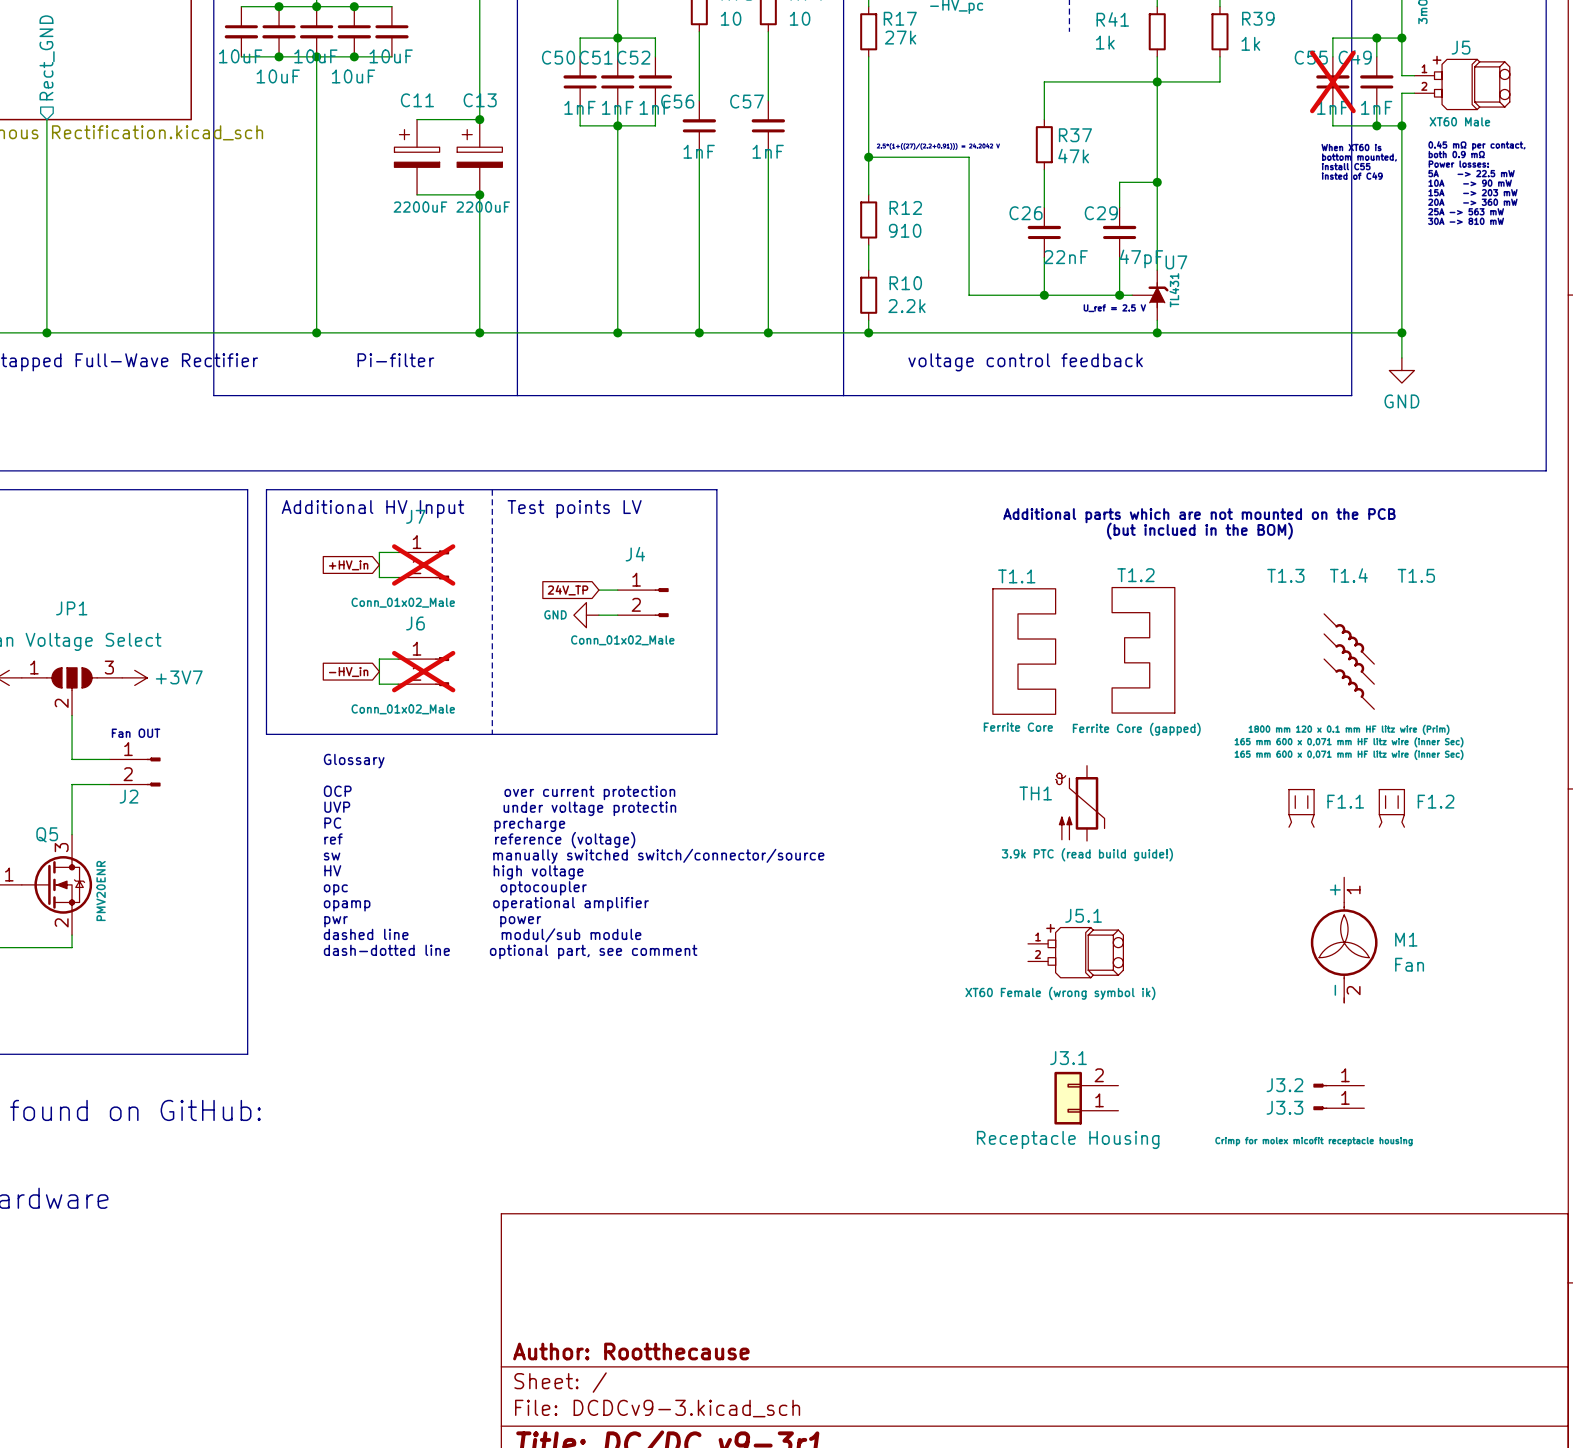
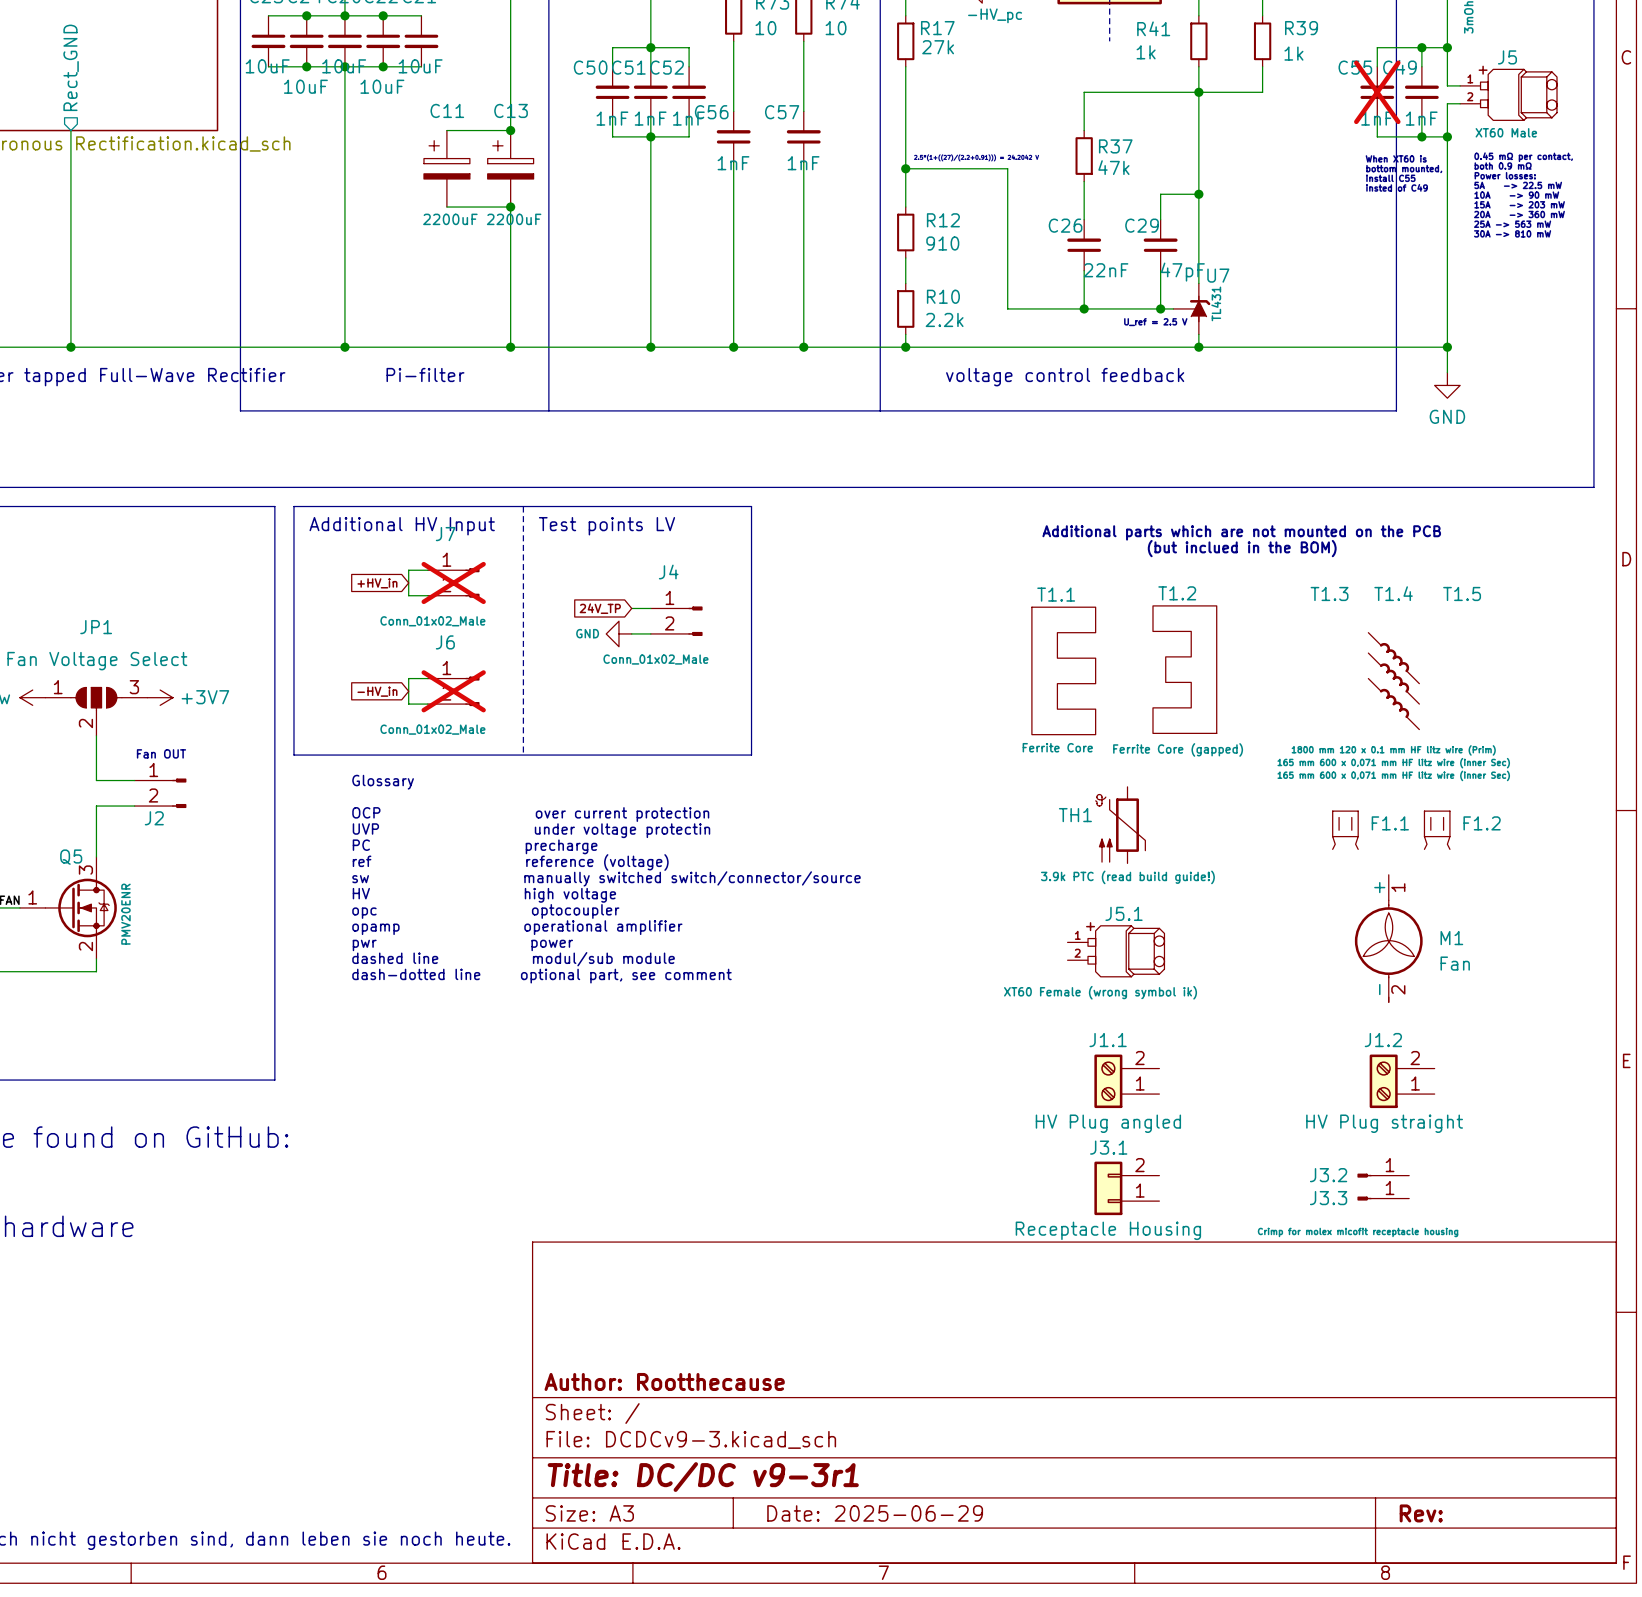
M1 position: (1344, 940) -> (1388, 938)
J5.1 position: (1075, 952) -> (1116, 951)
J1.1: none -> (1126, 1081)
J1.2: none -> (1402, 1081)
J3.2 position: (1338, 1085) -> (1383, 1175)
J3.1 position: (1086, 1098) -> (1126, 1188)
J3.3 position: (1338, 1108) -> (1383, 1198)

